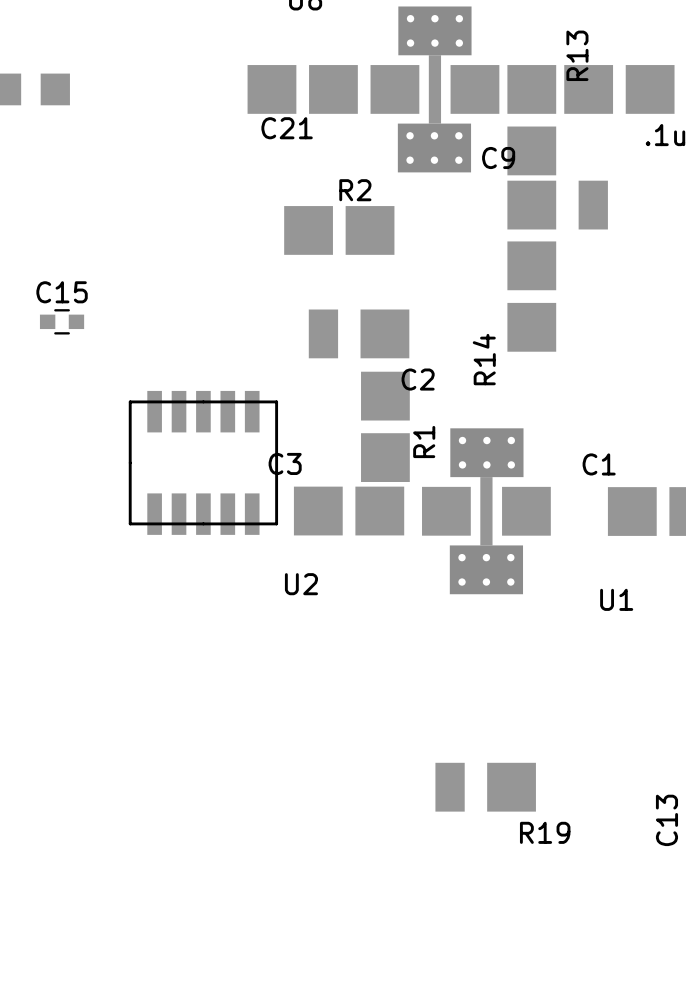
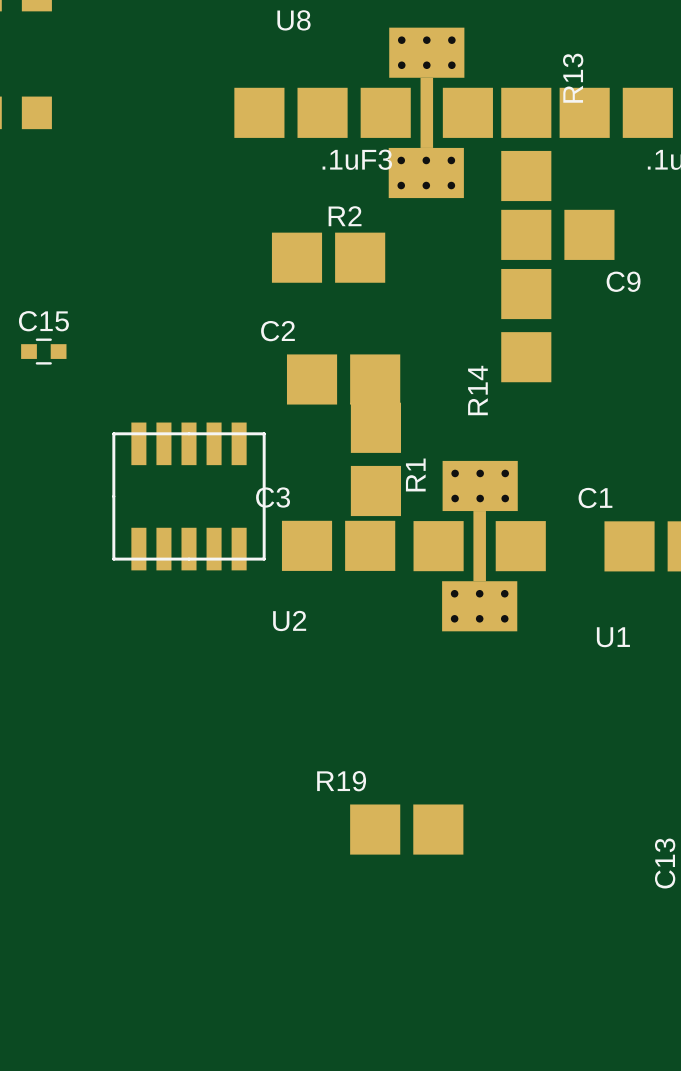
C21 name: C21 (287, 128) -> .1uF3 (357, 159)
C9 name position: C9 (498, 158) -> C9 (623, 281)
C9 footprint: [507, 180, 608, 230] -> [501, 209, 615, 260]
C2 footprint: [308, 309, 410, 359] -> [286, 354, 401, 405]
C2 name position: C2 (418, 379) -> C2 (277, 331)
R19 footprint: [435, 762, 536, 812] -> [350, 804, 464, 855]
R19 name position: R19 (545, 832) -> R19 (341, 781)

